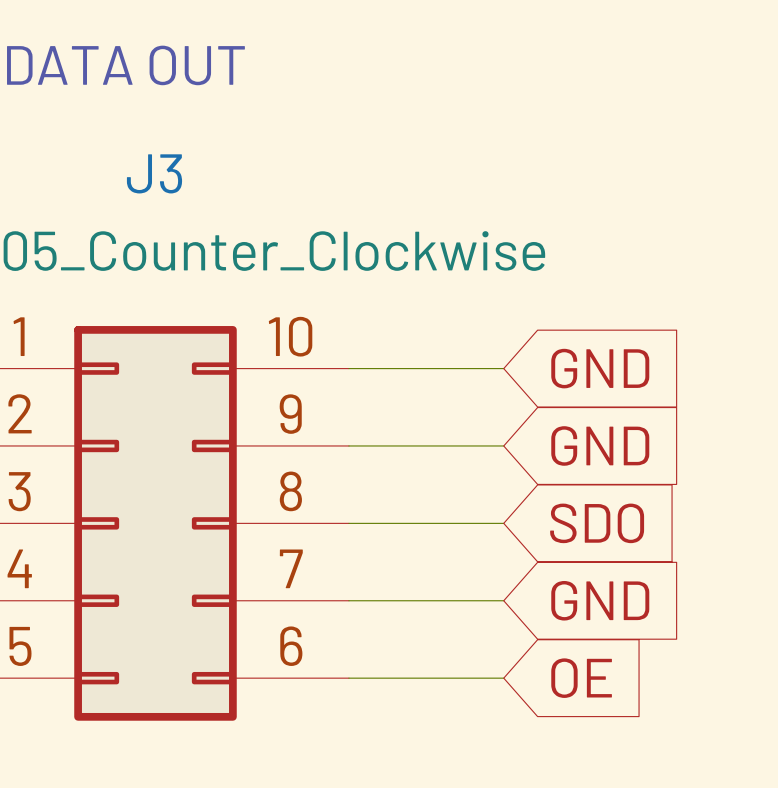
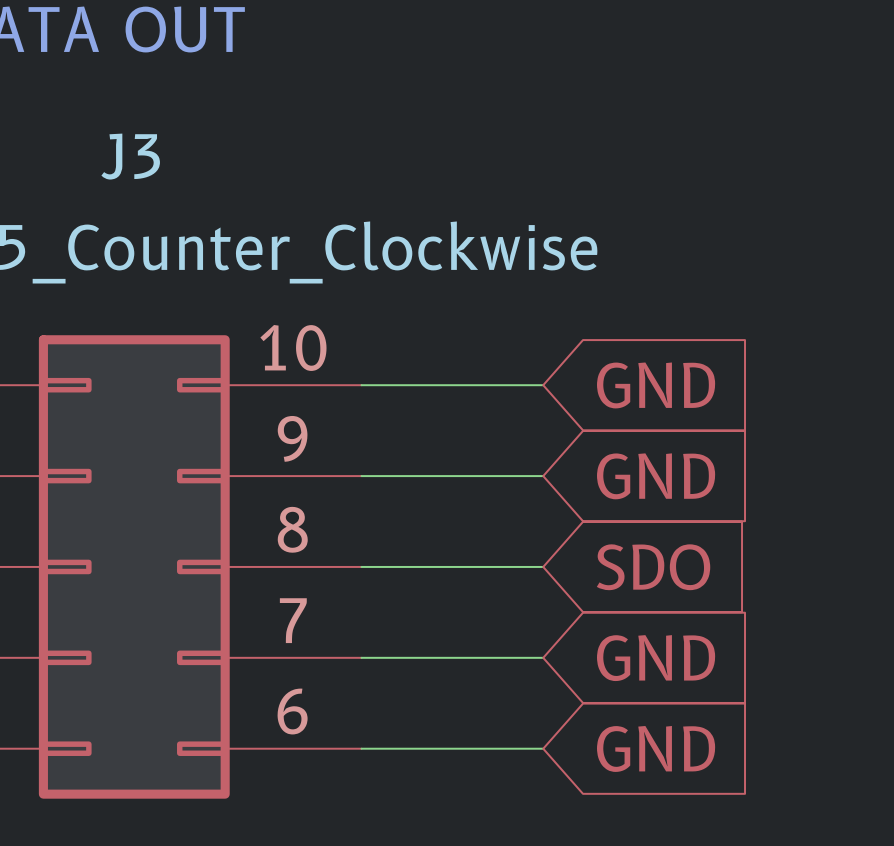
global label: OE (581, 678) -> GND (656, 748)

